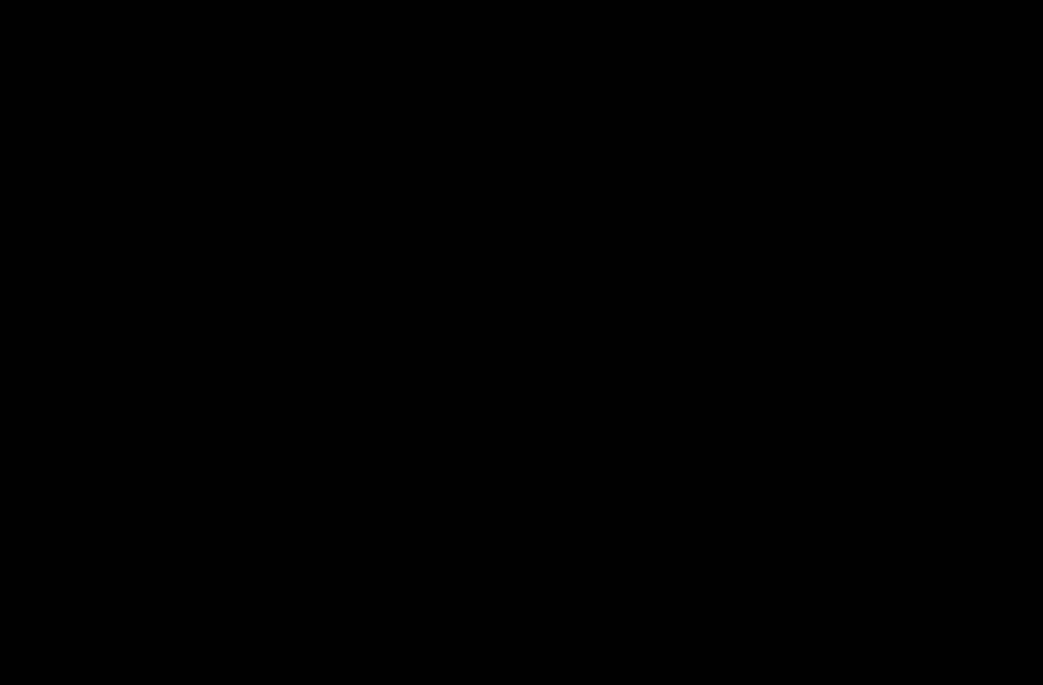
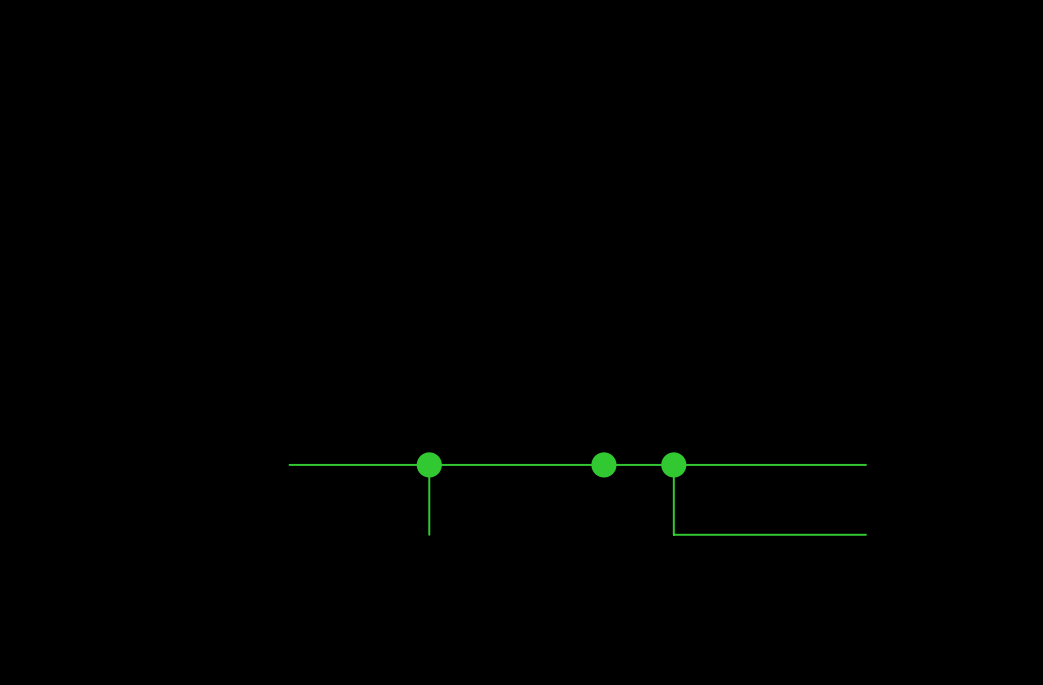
wire: none -> (289, 464) (865, 464)
wire: none -> (429, 464) (429, 534)
junction: none -> (429, 464)
junction: none -> (603, 464)
wire: none -> (673, 464) (673, 534) (865, 534)
junction: none -> (673, 464)

